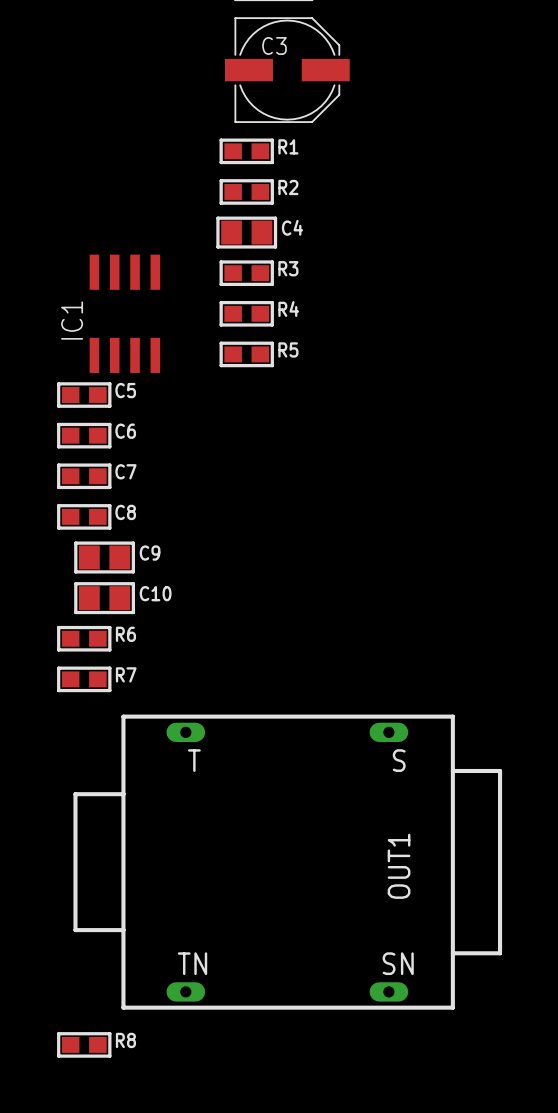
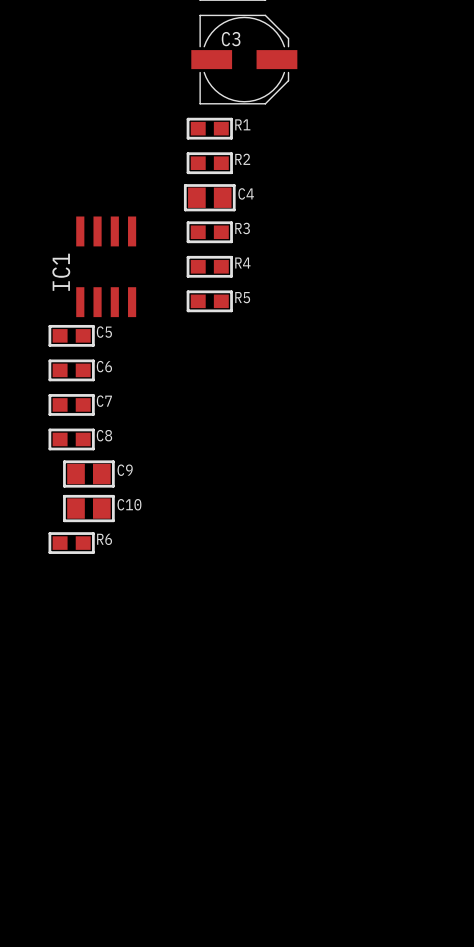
R7: (84, 679) -> none
OUT1: (287, 862) -> none
R8: (84, 1044) -> none

